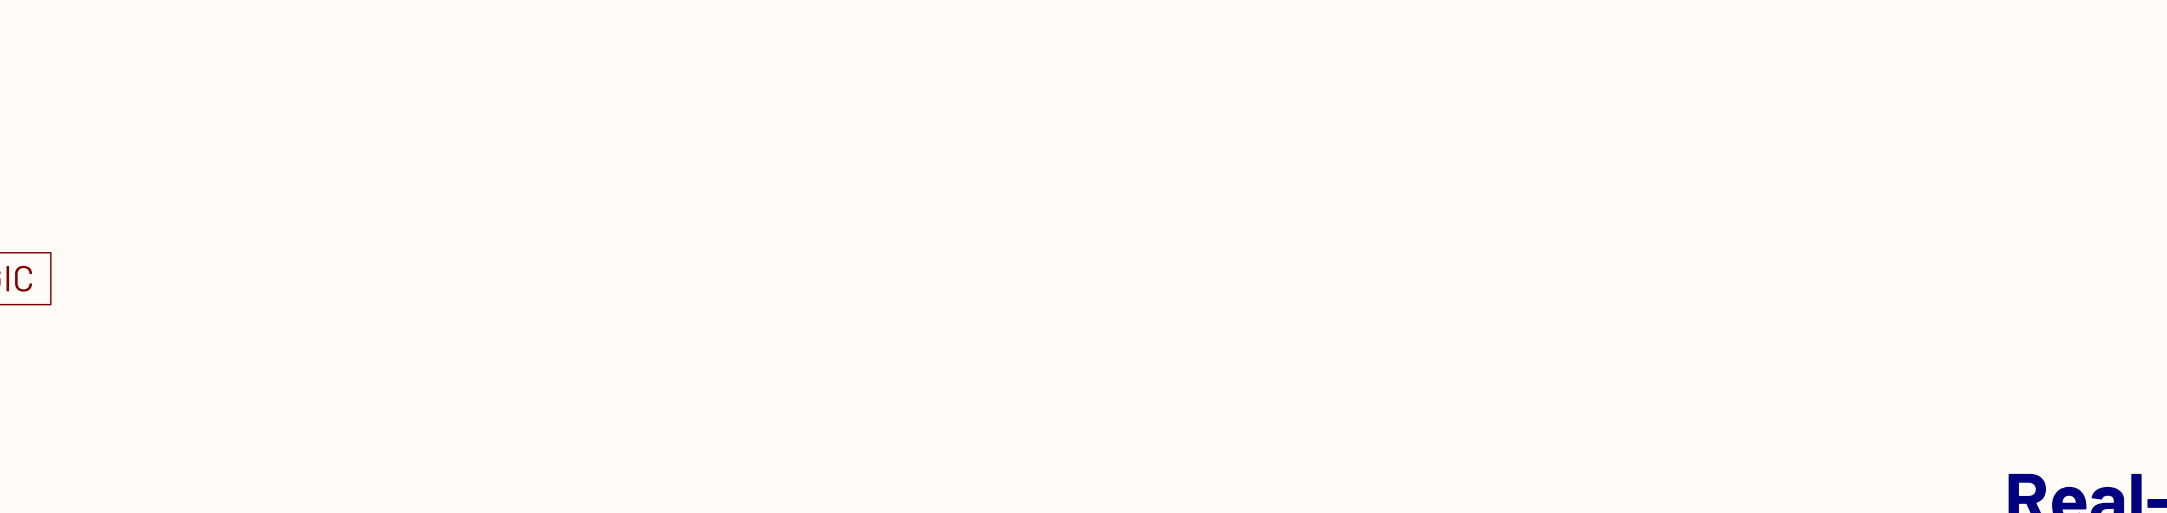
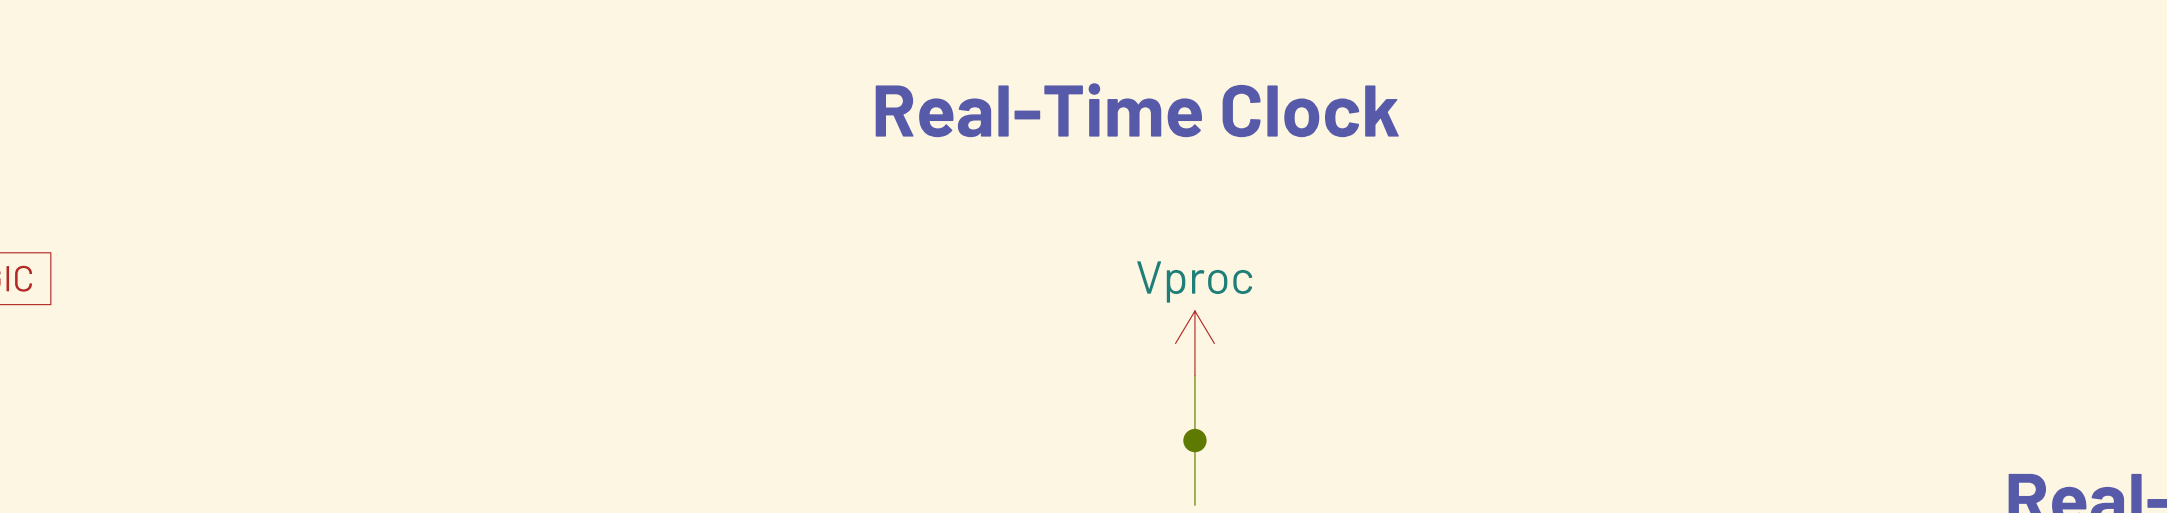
text: none -> Real-Time Clock (1137, 110)
power symbol: none -> Vproc (1194, 343)
wire: none -> (1194, 375) (1194, 505)
junction: none -> (1194, 440)

